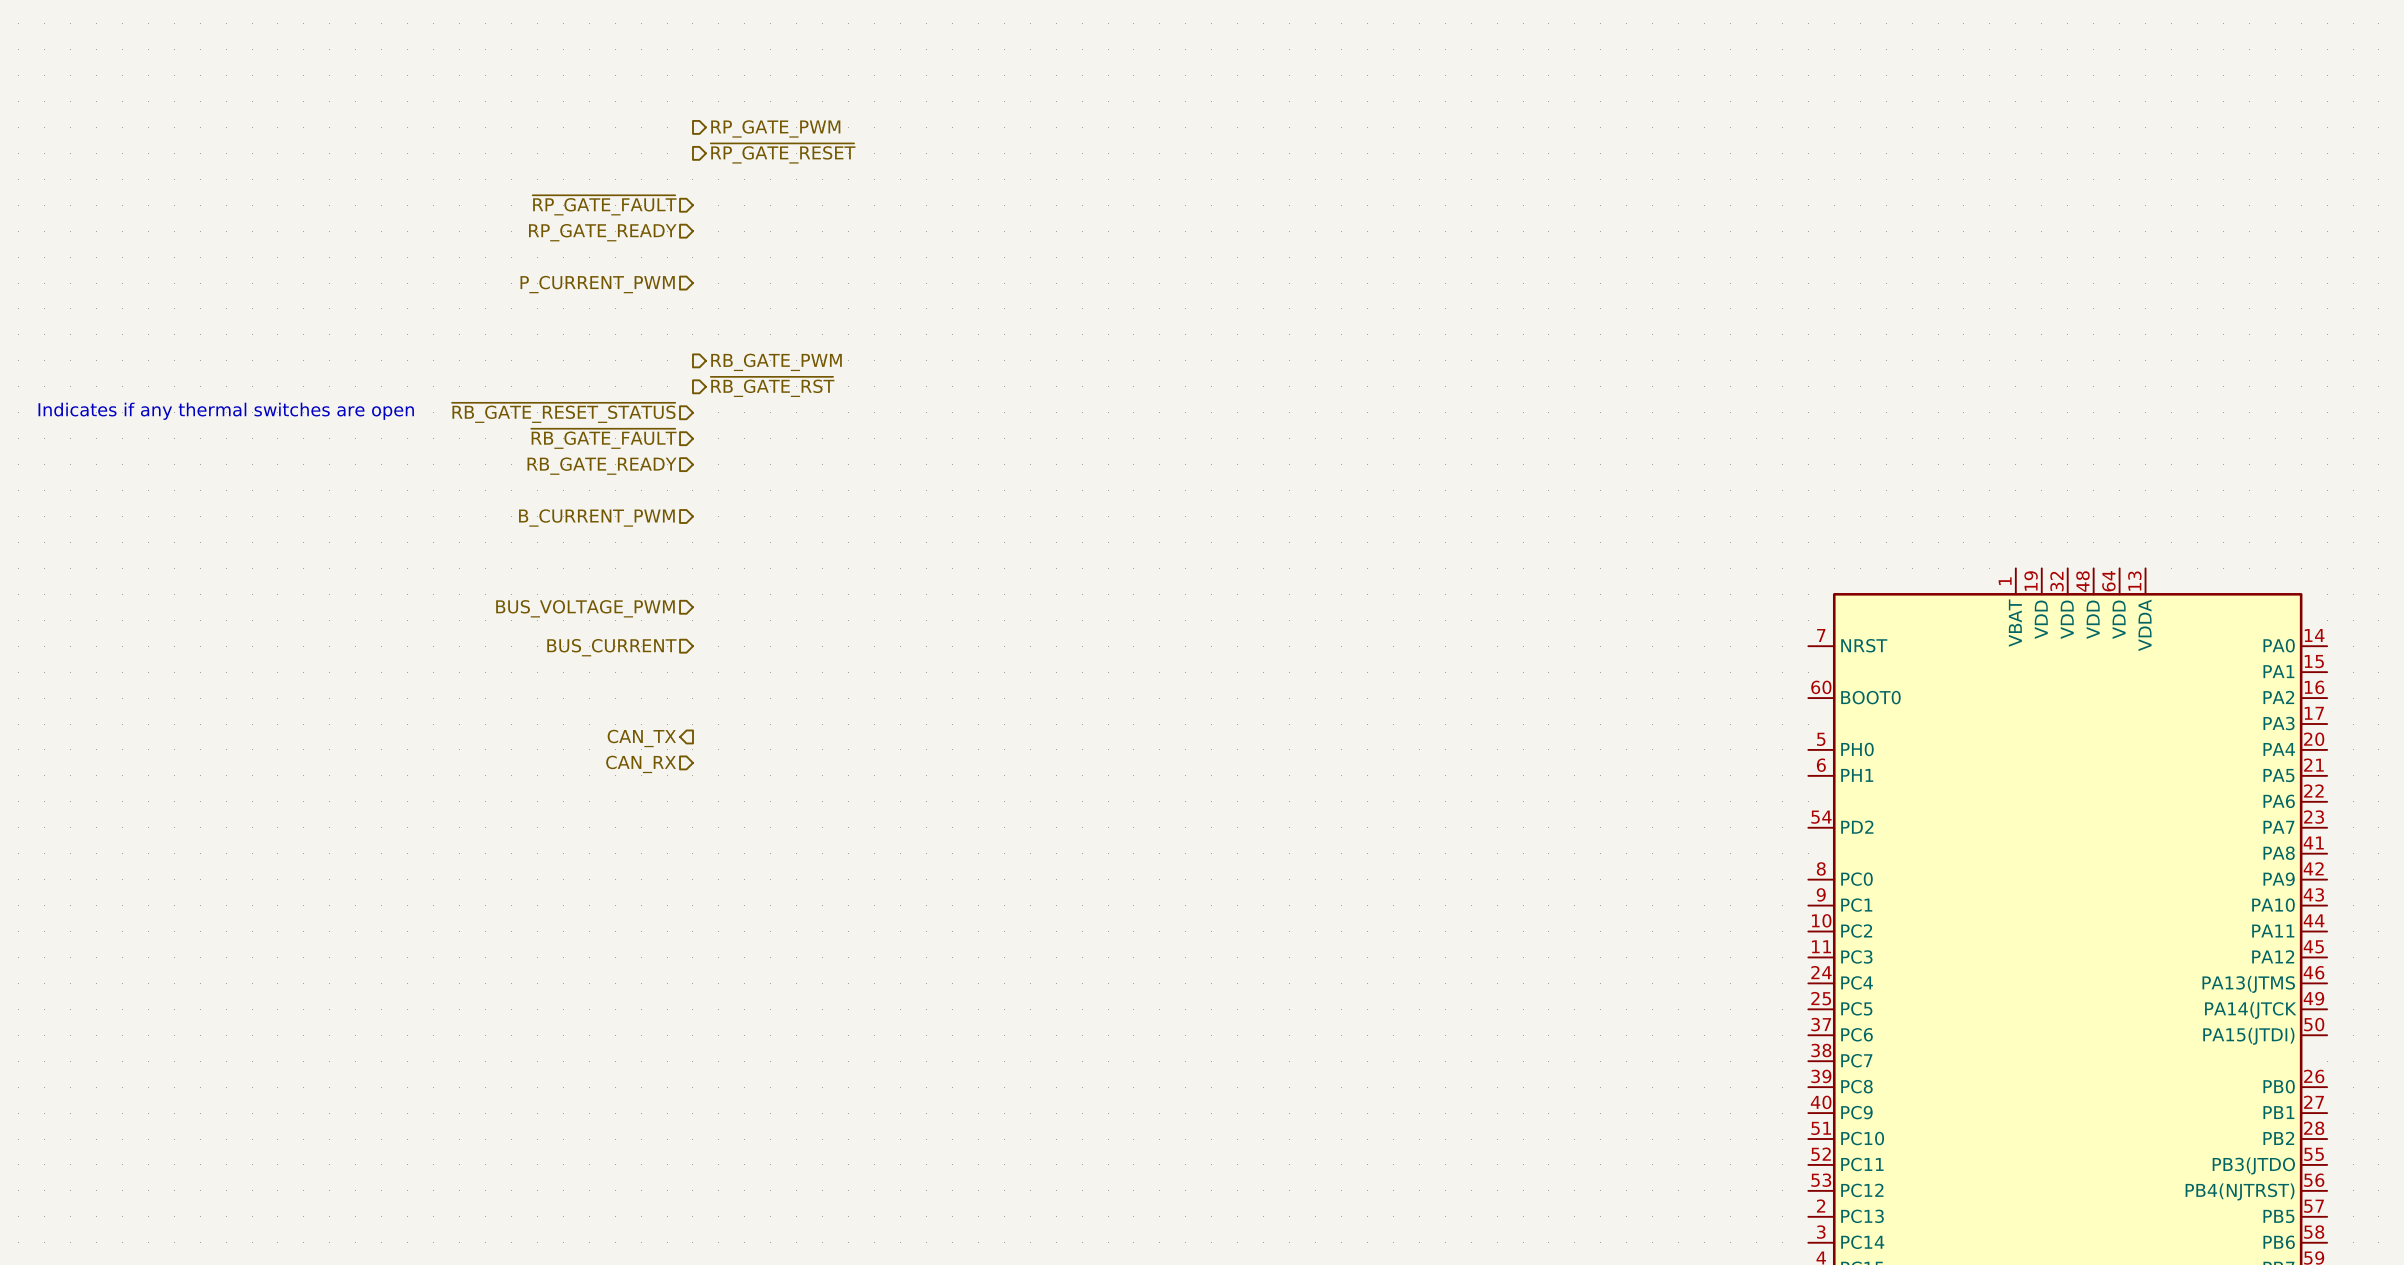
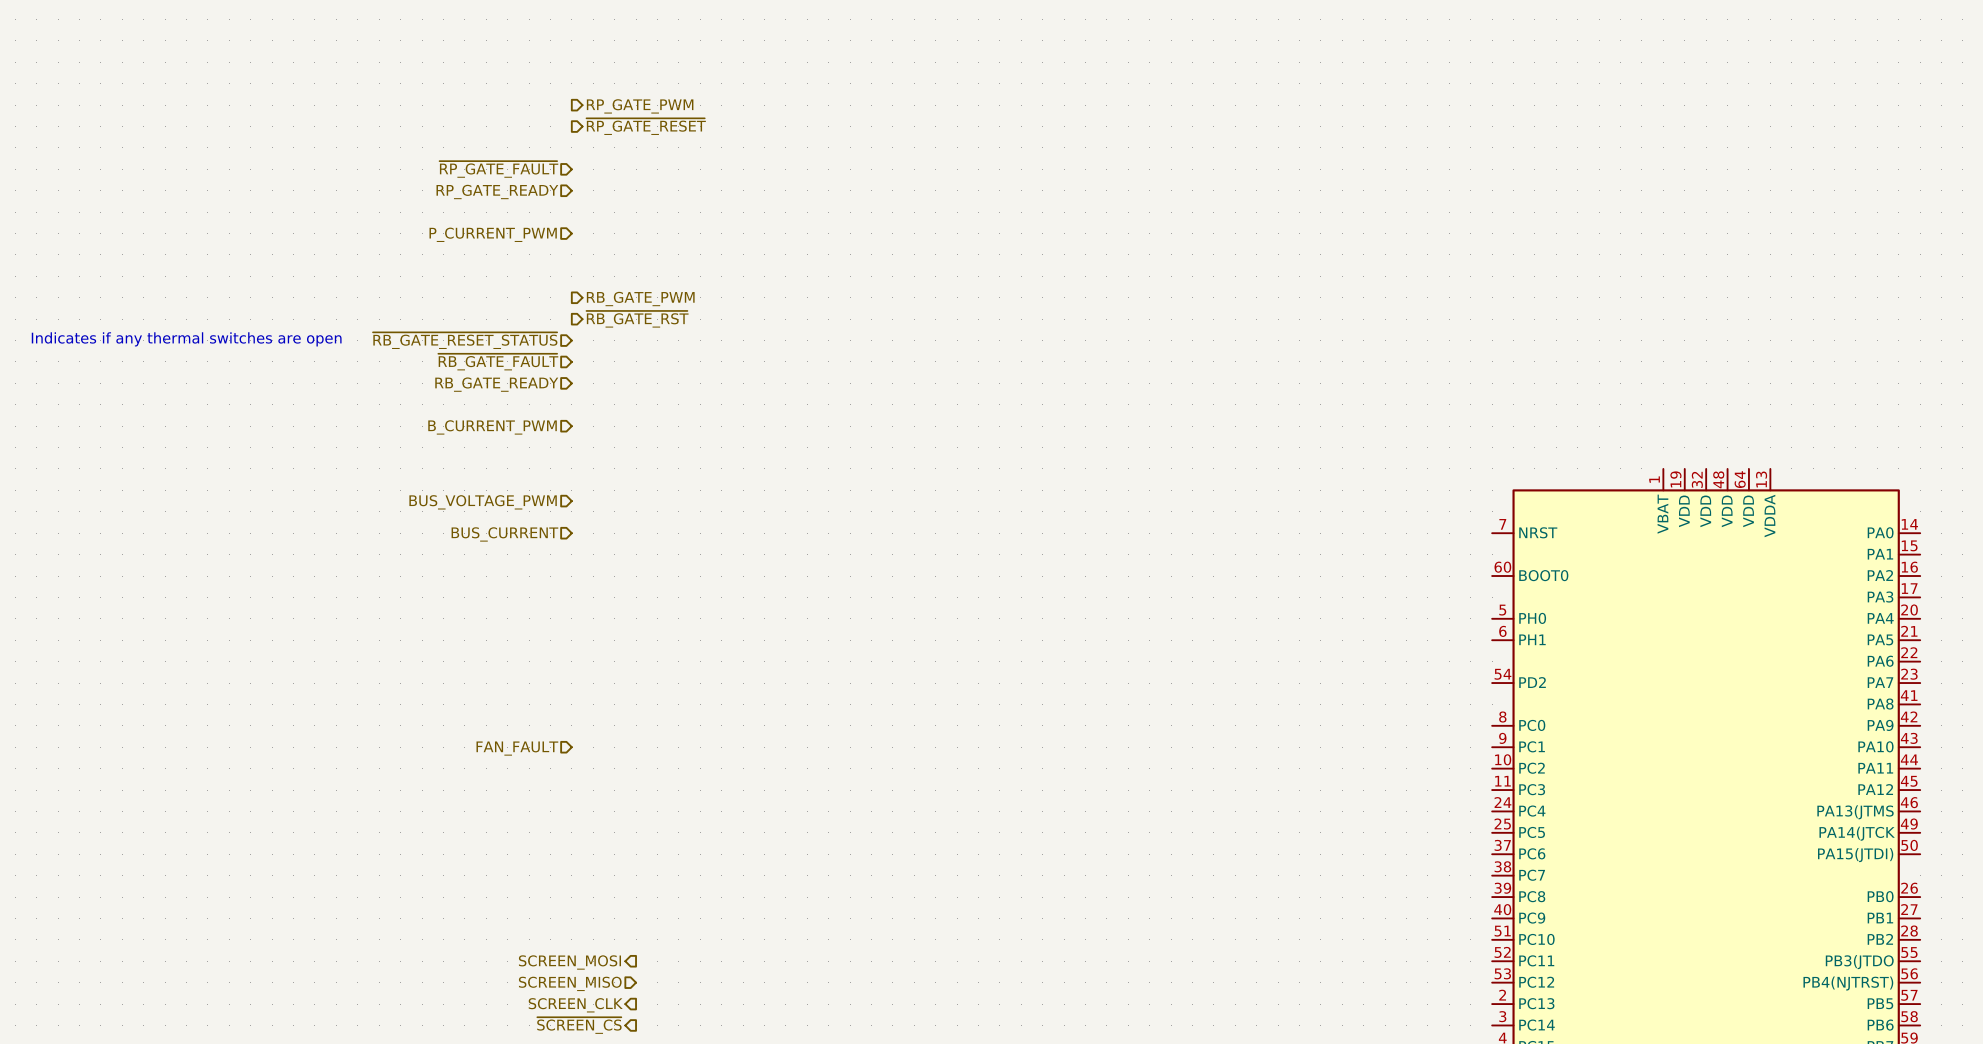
hierarchical label: CAN_TX (641, 738) -> none
hierarchical label: CAN_RX (641, 764) -> none
hierarchical label: none -> FAN_FAULT (517, 748)
hierarchical label: none -> SCREEN_MOSI (569, 962)
hierarchical label: none -> SCREEN_MISO (570, 983)
hierarchical label: none -> SCREEN_CLK (575, 1005)
hierarchical label: none -> ~{SCREEN_CS} (579, 1025)

